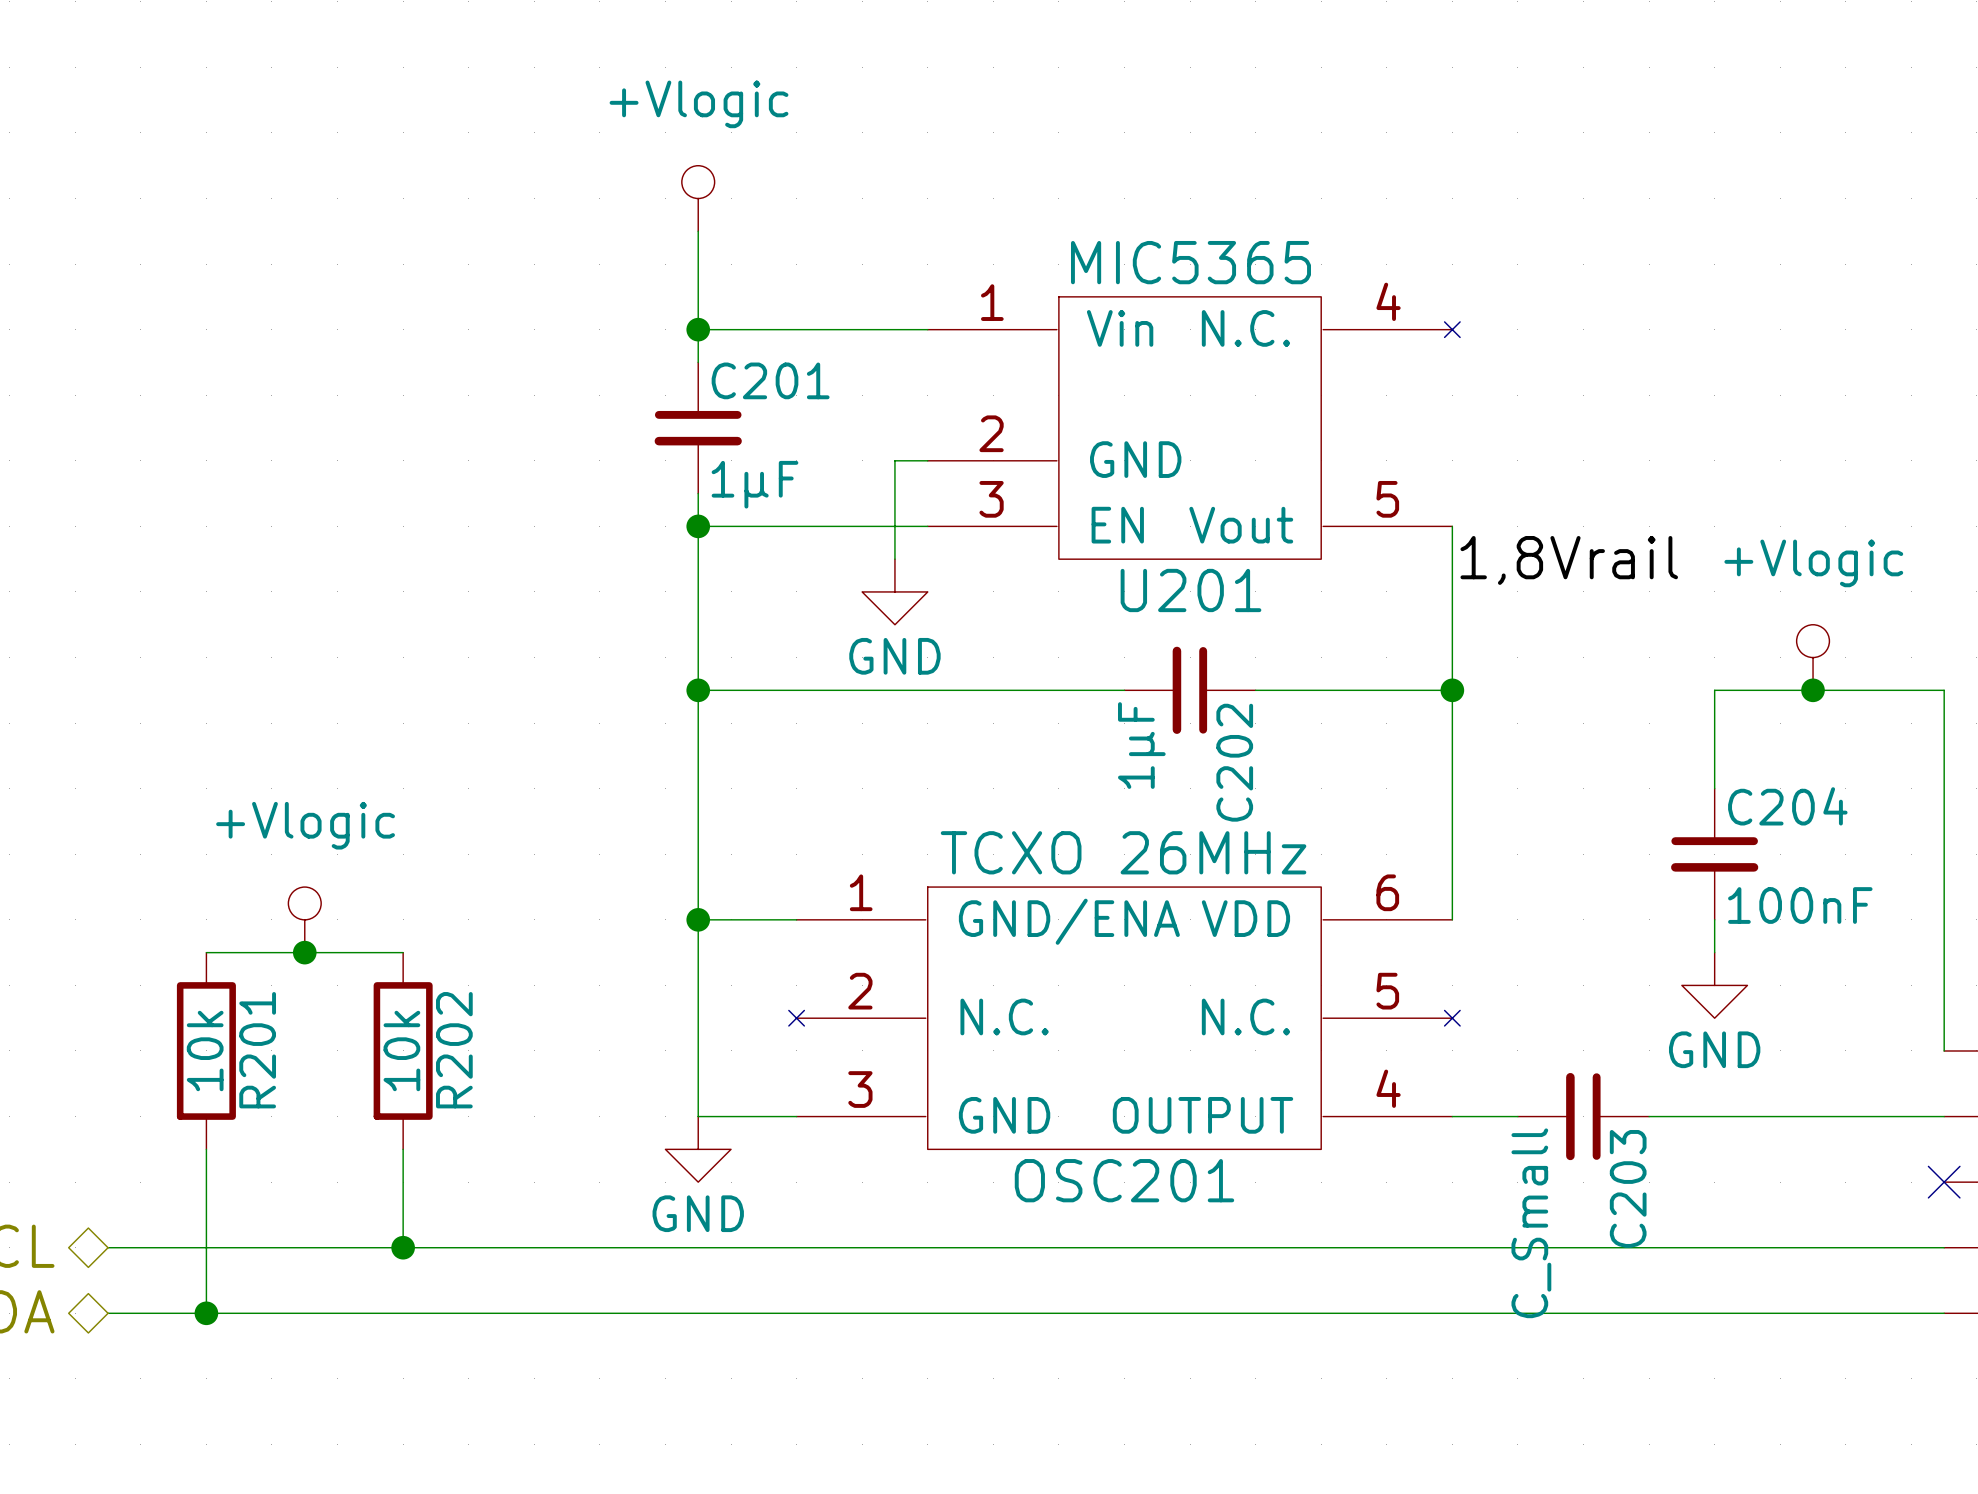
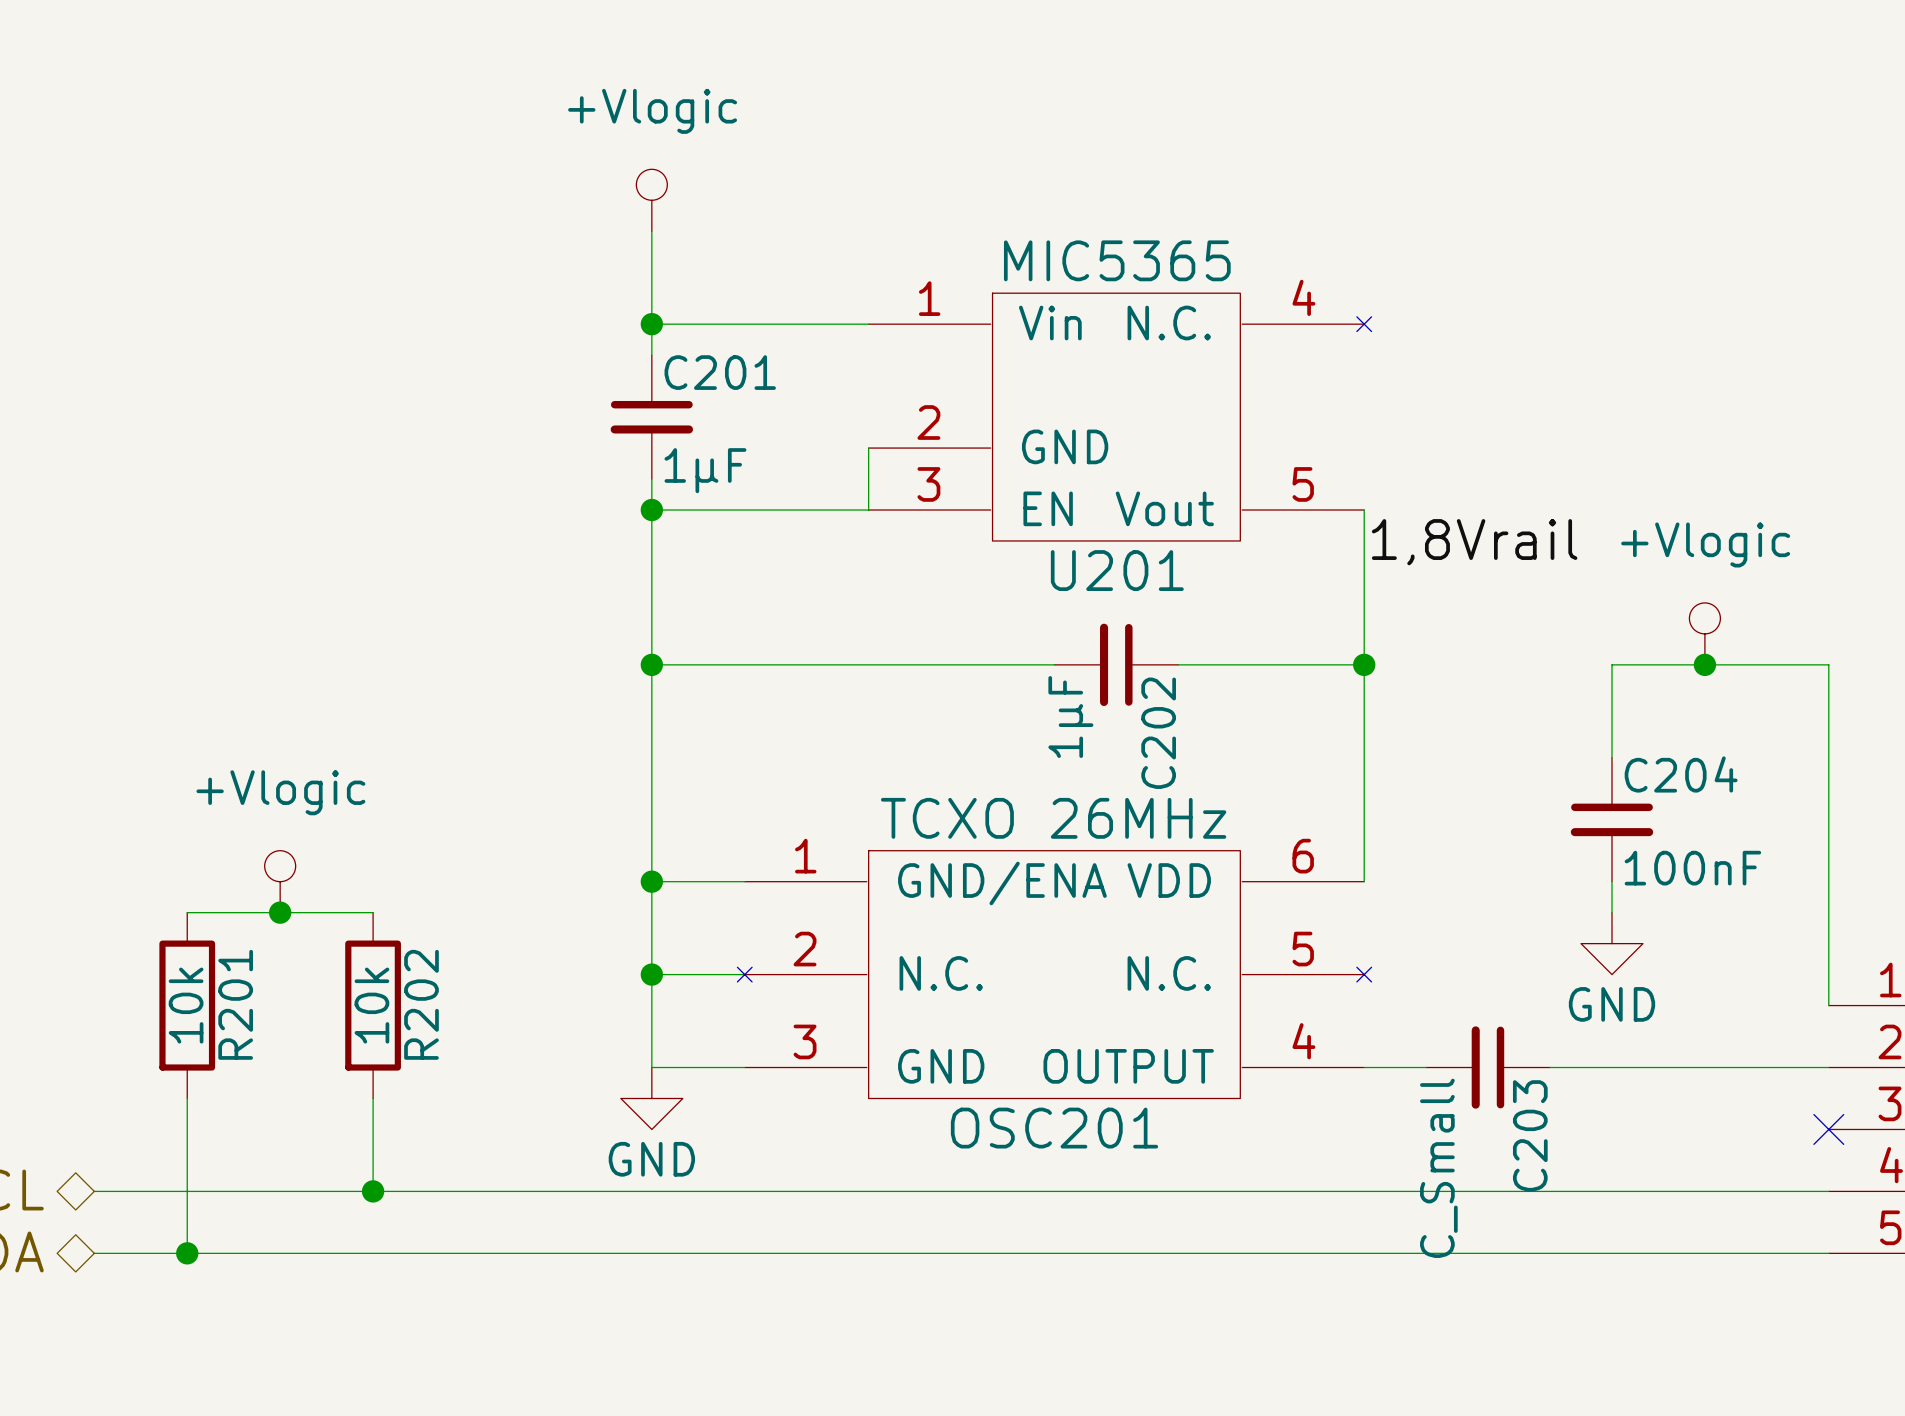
wire: (927, 460) (894, 460) (894, 559) -> (868, 448) (868, 510)
power symbol: GND (894, 591) -> none
wire: none -> (651, 974) (744, 974)
junction: none -> (651, 974)

